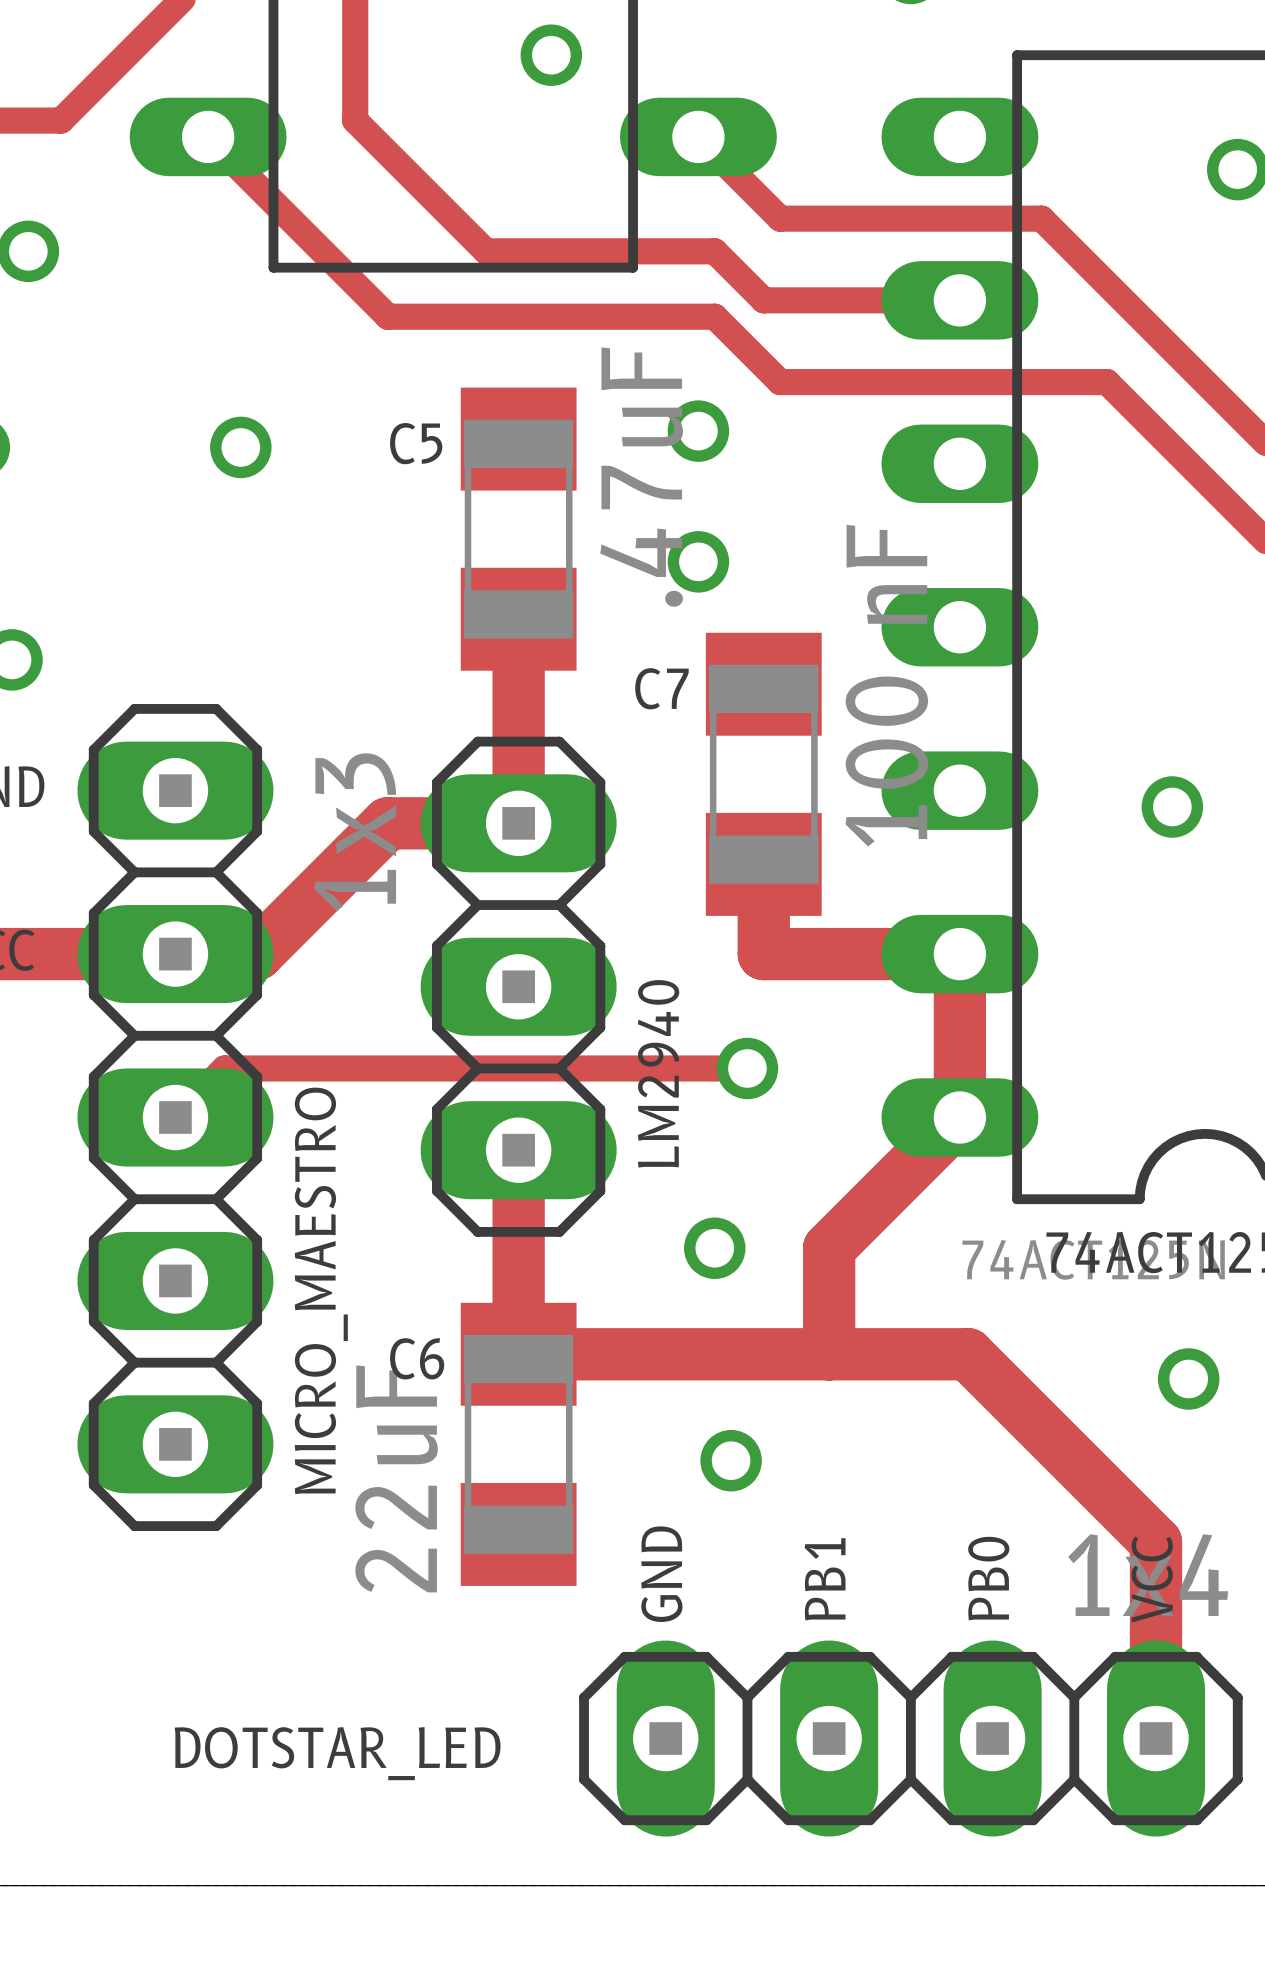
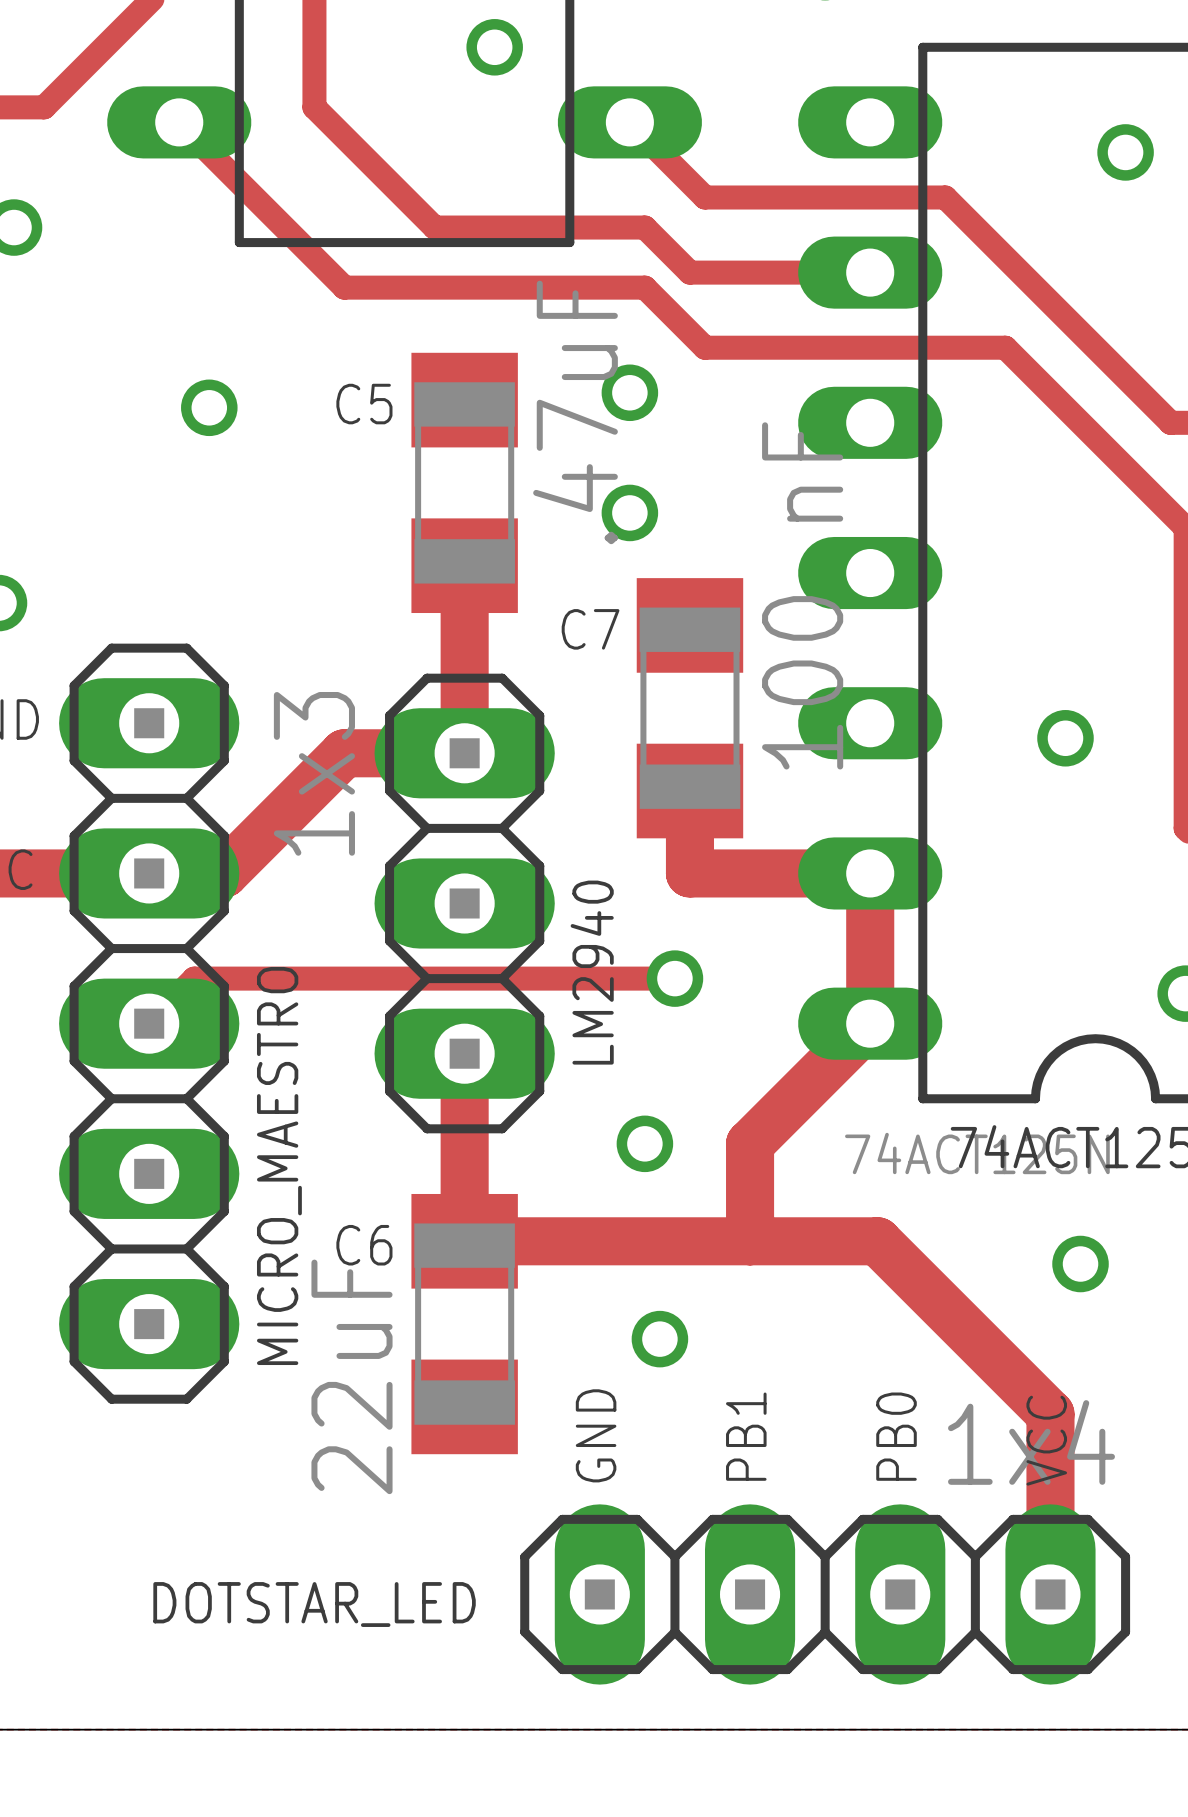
C5 name position: C5 (416, 443) -> C5 (364, 404)
C7 name position: C7 (661, 688) -> C7 (590, 629)
C6 name position: C6 (417, 1358) -> C6 (364, 1245)

